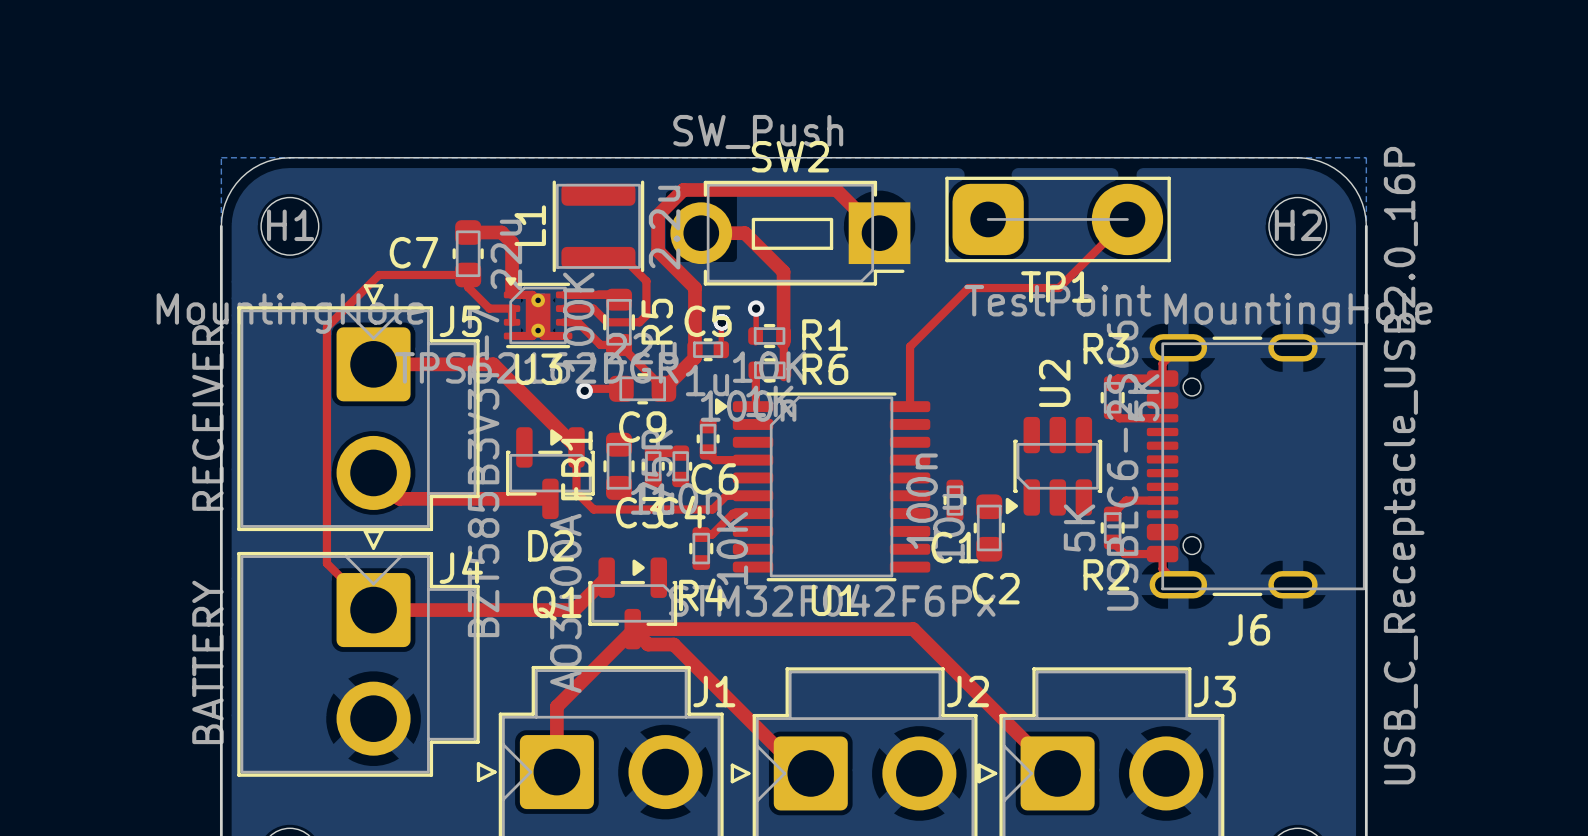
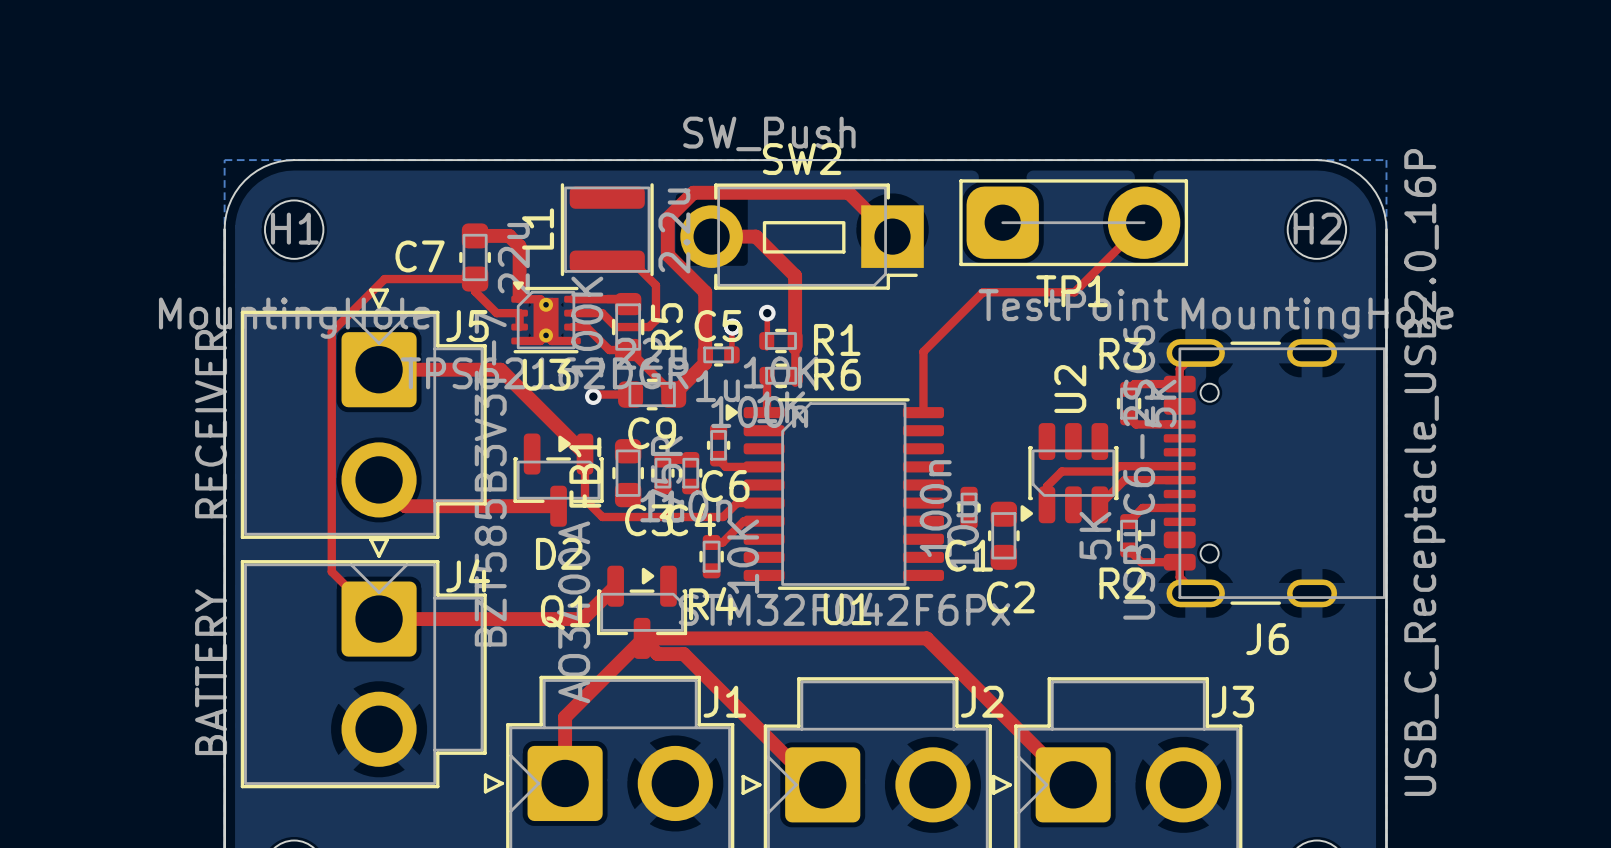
top track: none -> (1179, 466) (1118, 466) (1113, 471) (1061, 471) (1046, 486) (1046, 504)
top track: none -> (1179, 480) (1124, 480) (1099, 504)

